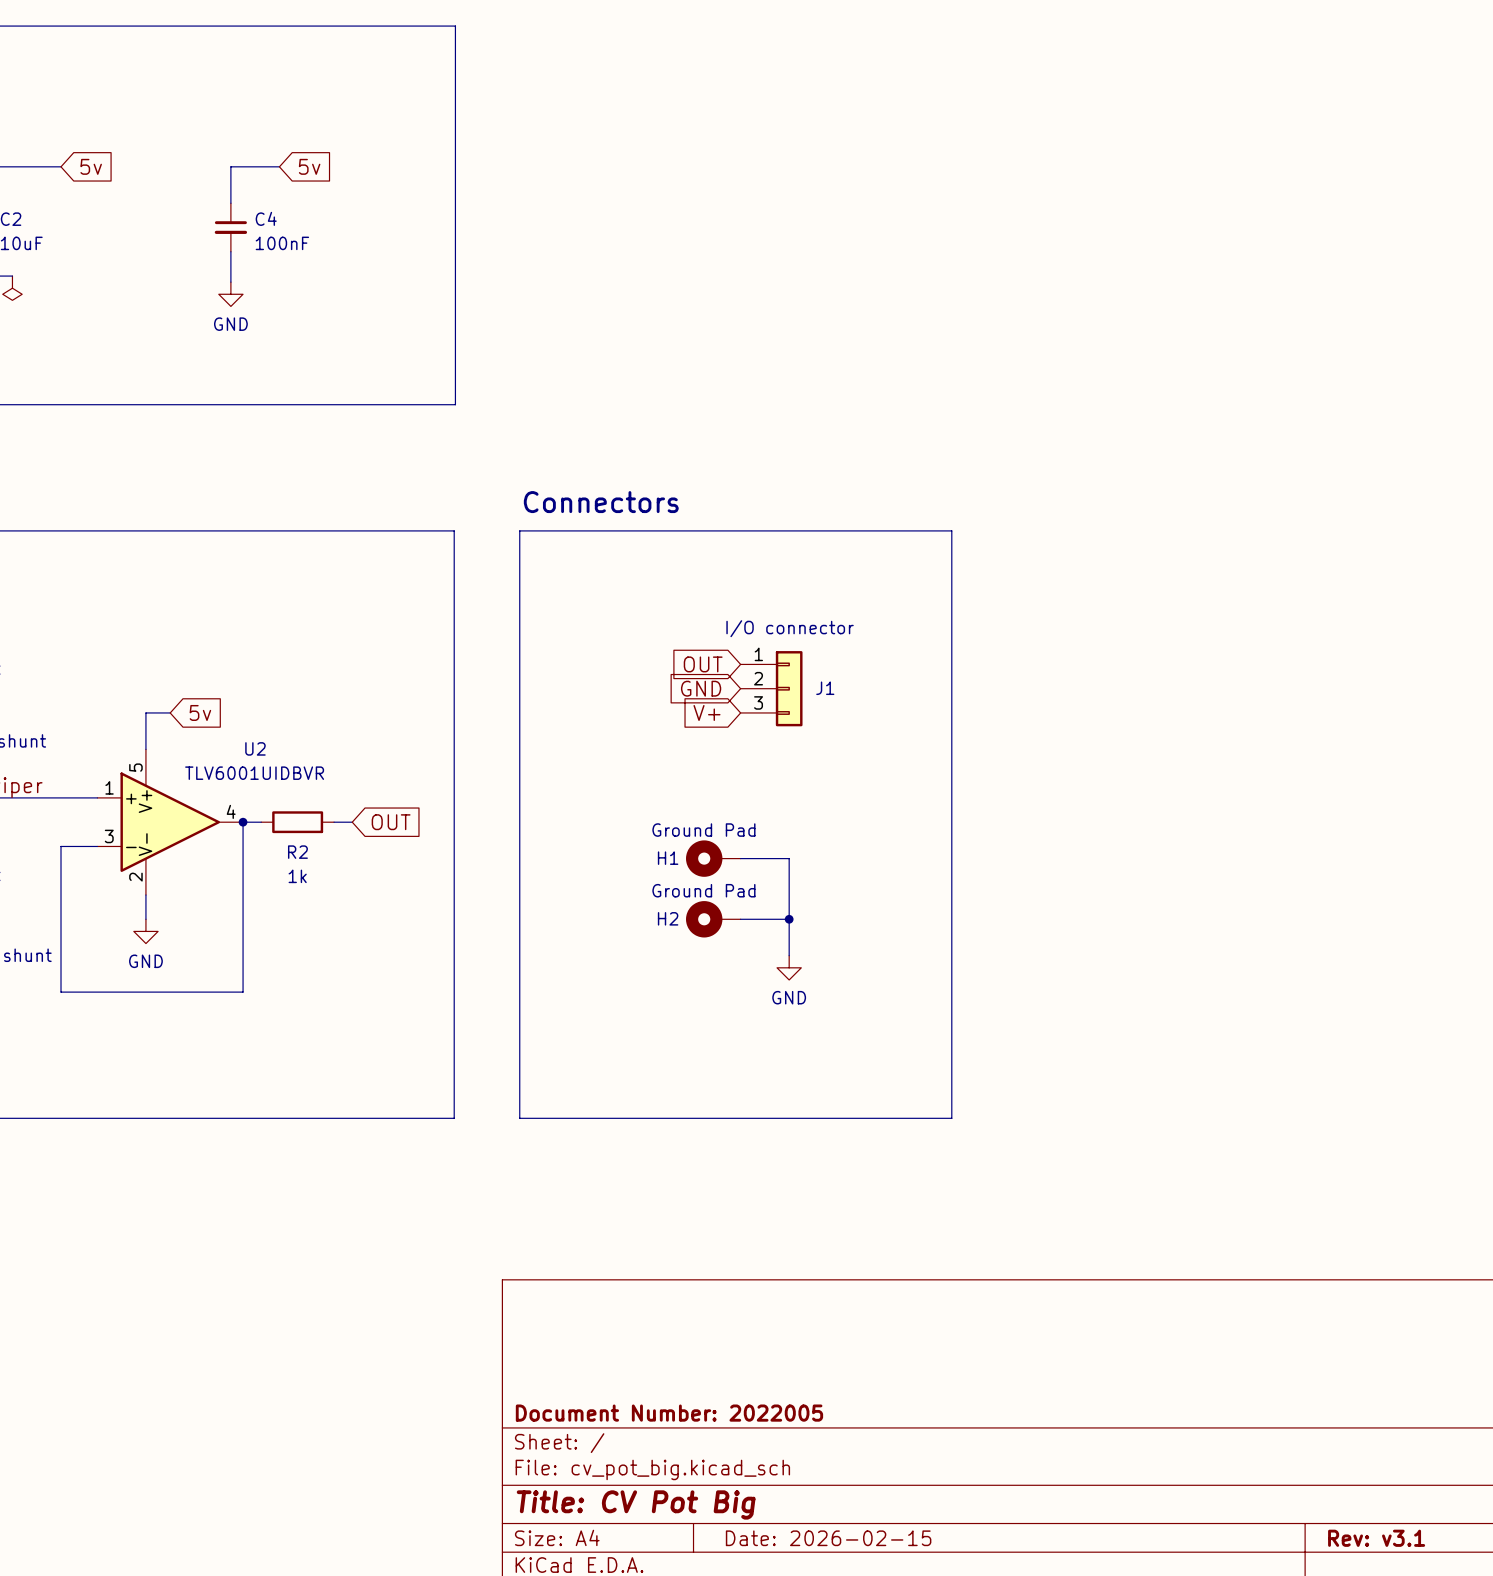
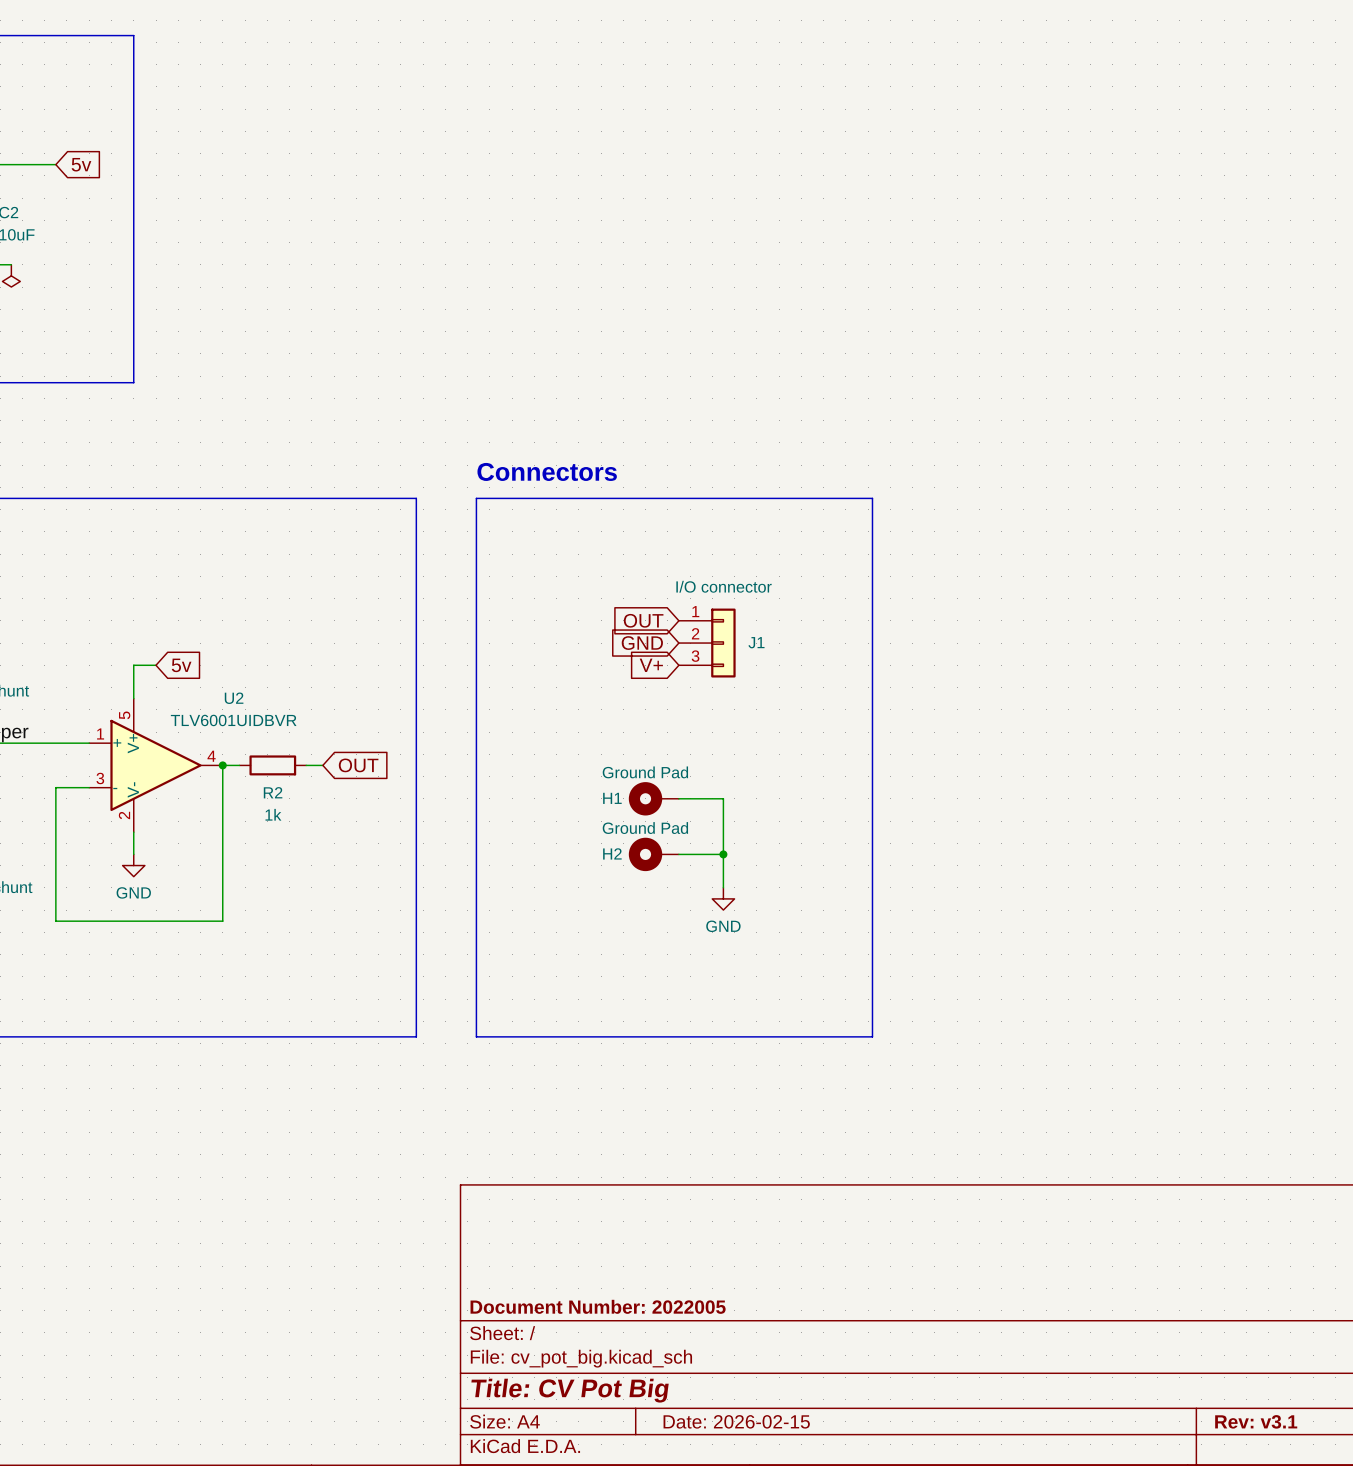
line: (145, 26) (455, 26) (455, 404) (145, 404) -> (133, 35) (133, 382)
wire: (279, 166) (230, 166) (230, 203) -> none
global label: 5v (309, 166) -> none
C4: 100nF (230, 227) -> none
wire: (230, 251) (230, 282) -> none
power symbol: GND (230, 294) -> none

